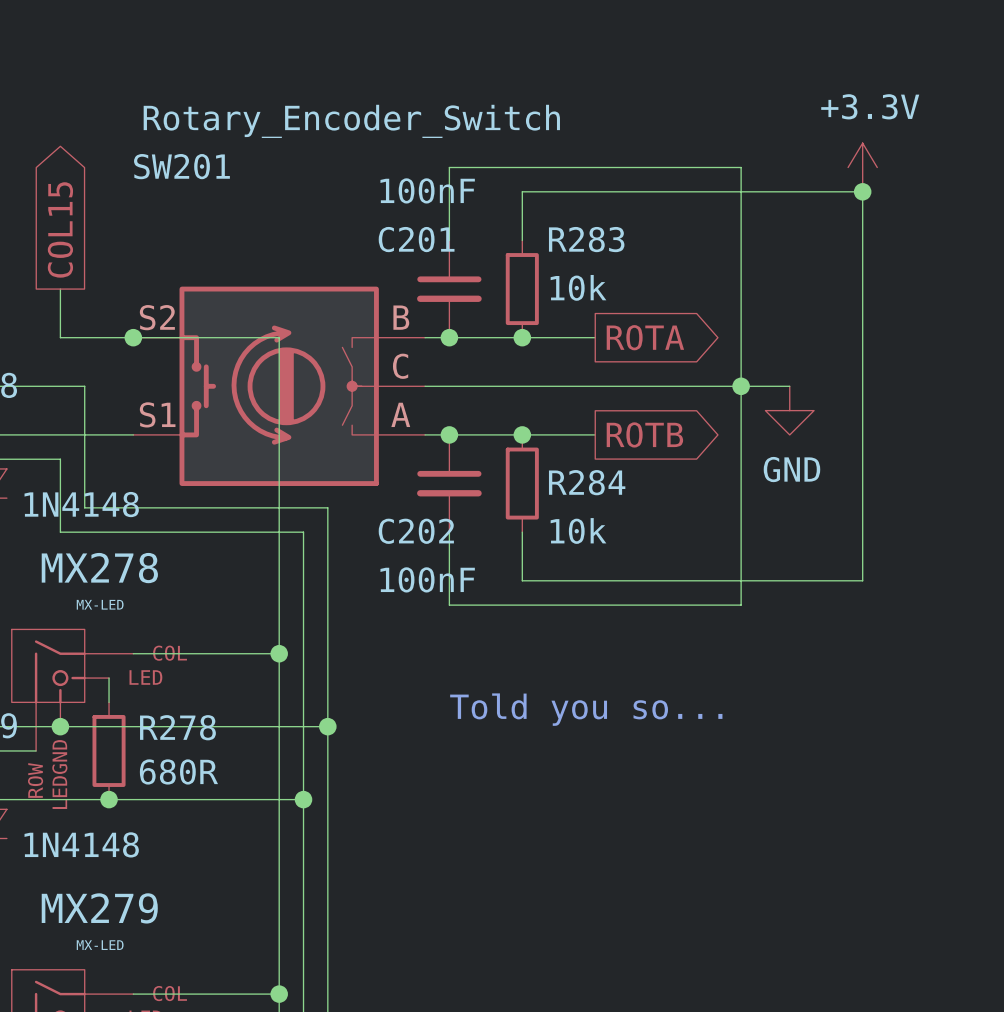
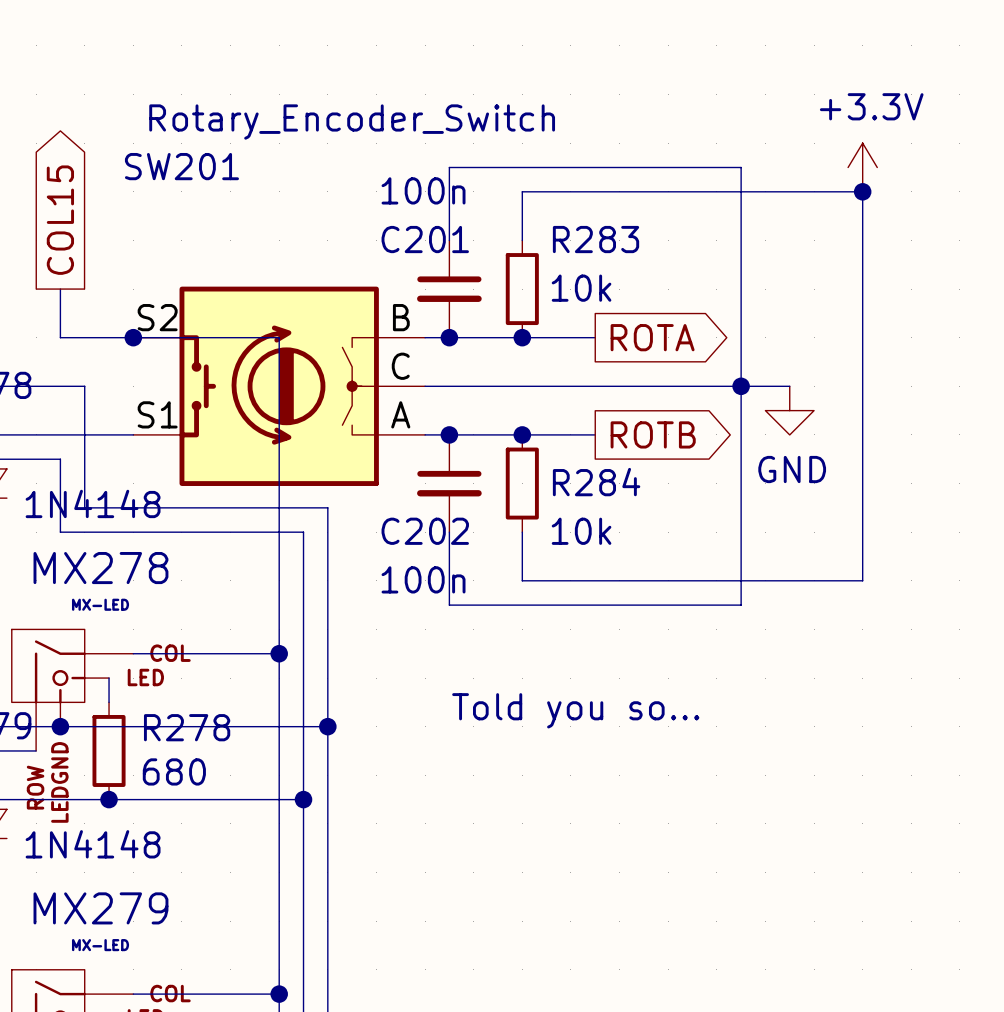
C201 value: 100nF (427, 190) -> 100n (423, 190)
C202 value: 100nF (427, 579) -> 100n (423, 579)
R278 value: 680R (178, 771) -> 680 (174, 771)

